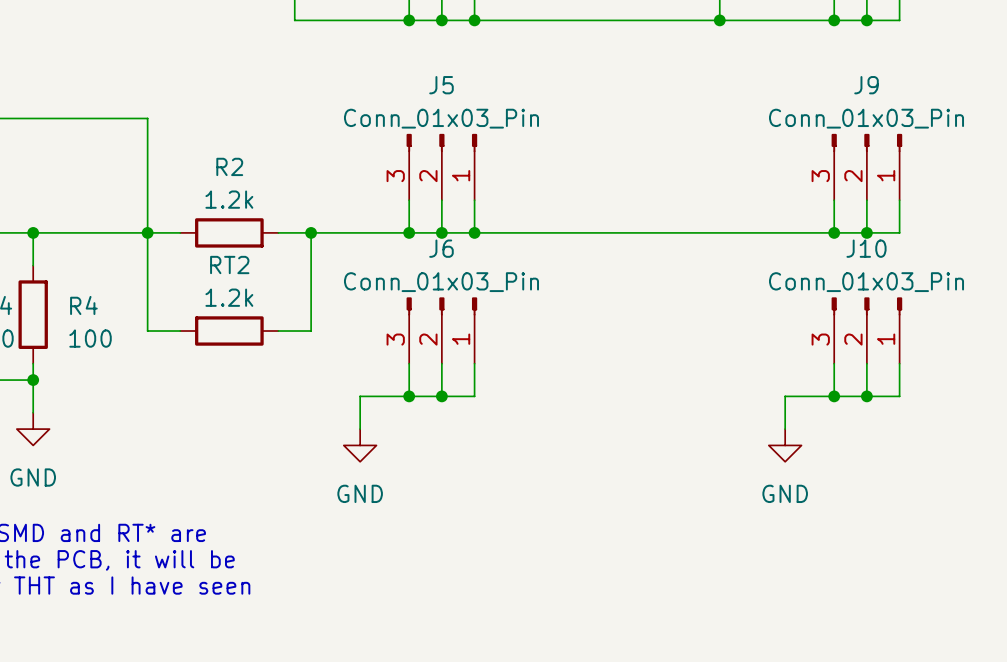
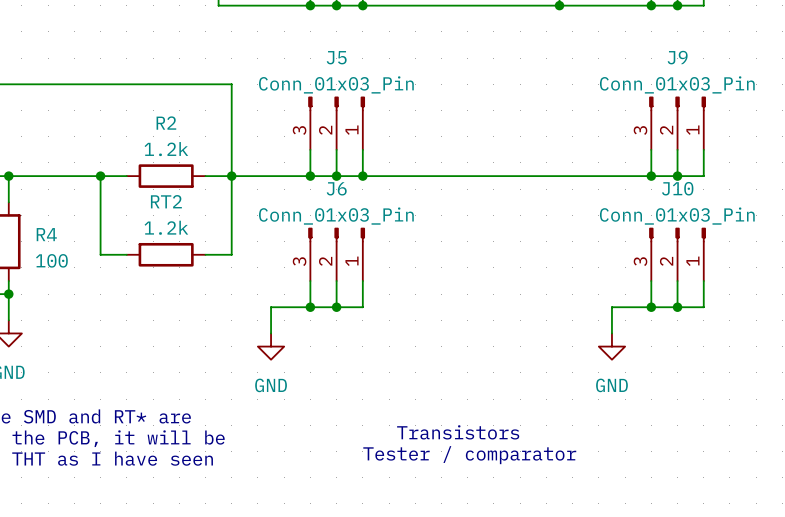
wire: (147, 118) (147, 232) -> (100, 84) (231, 84) (231, 176)
text: none -> Transistors (458, 432)
text: none -> Tester / comparator (469, 455)

